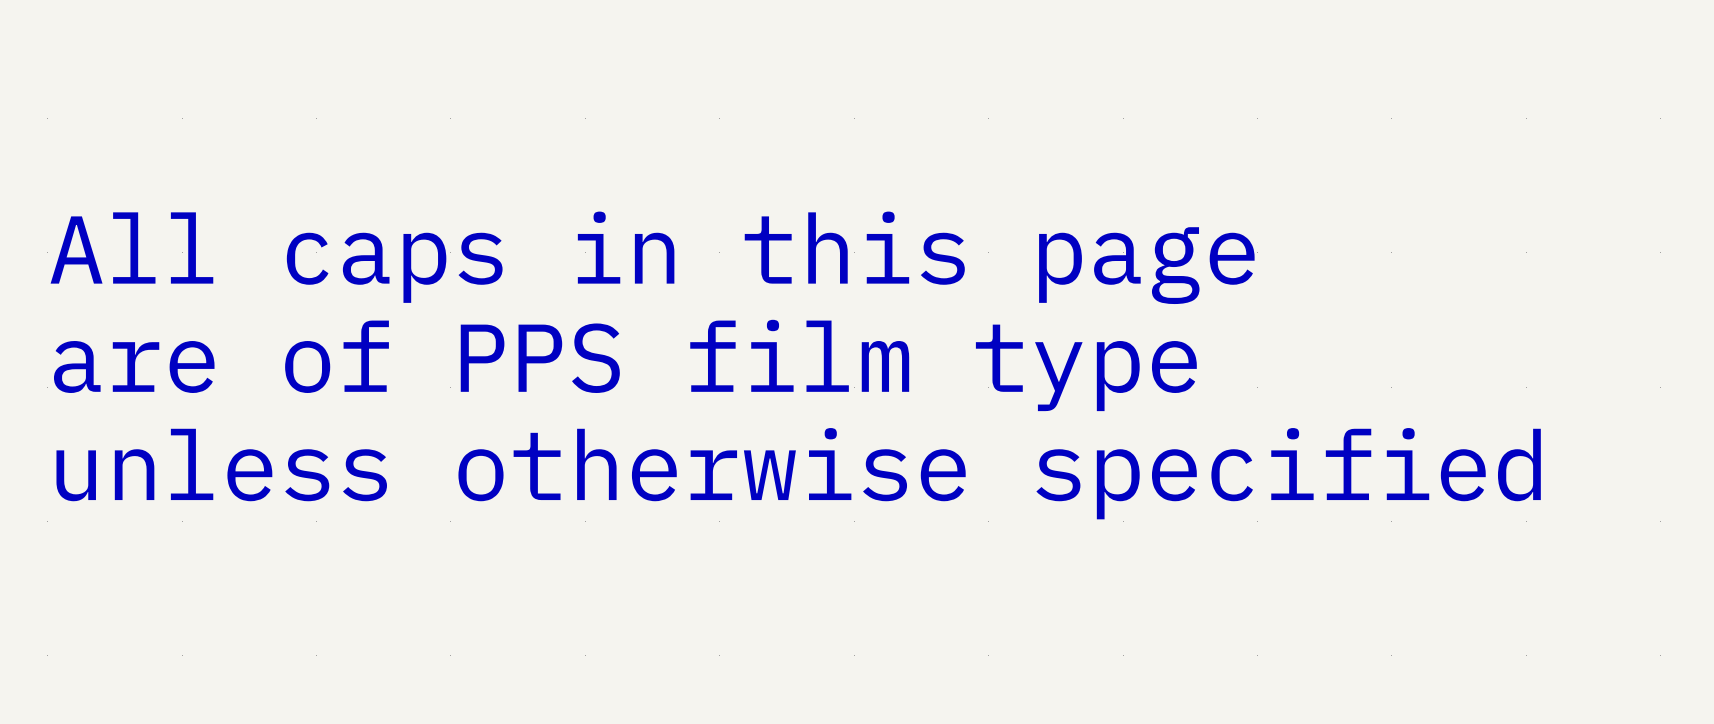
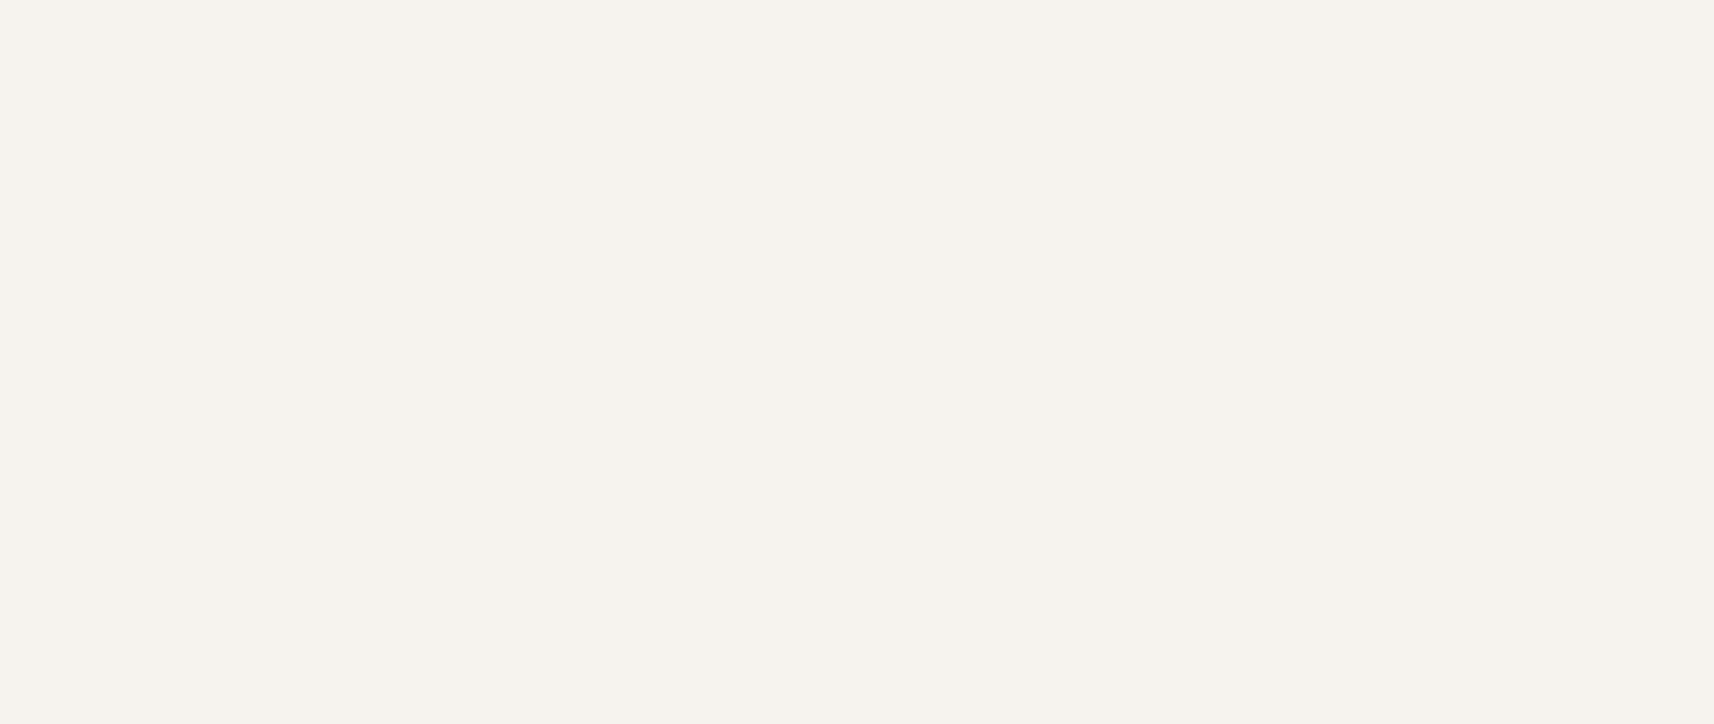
text: All caps in this page (652, 257) -> none
text: are of PPS film type (625, 365) -> none
text: unless otherwise specified (798, 473) -> none

